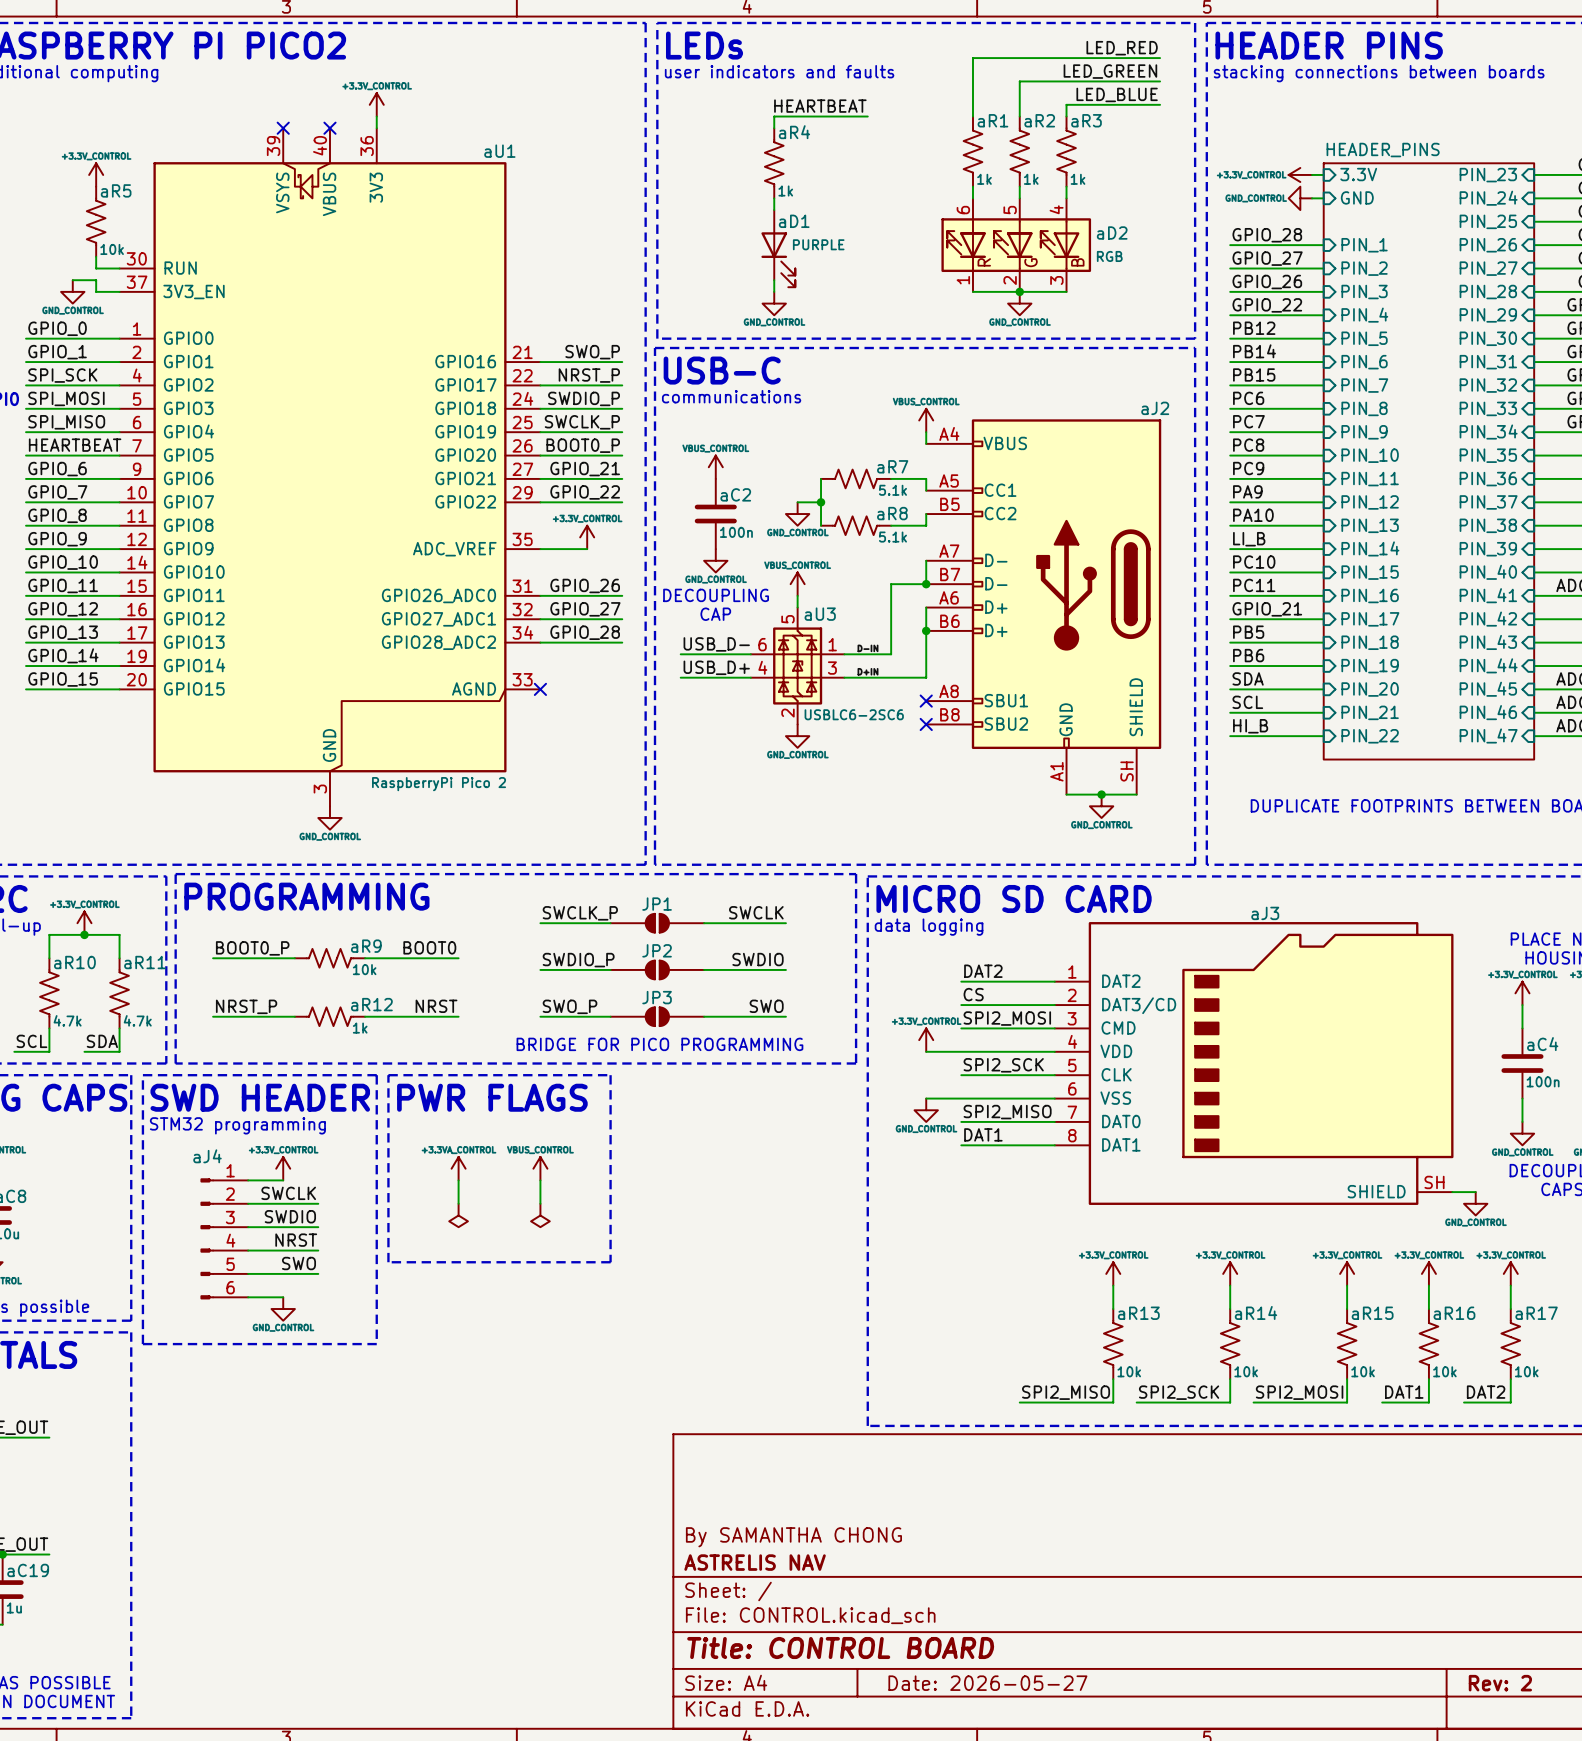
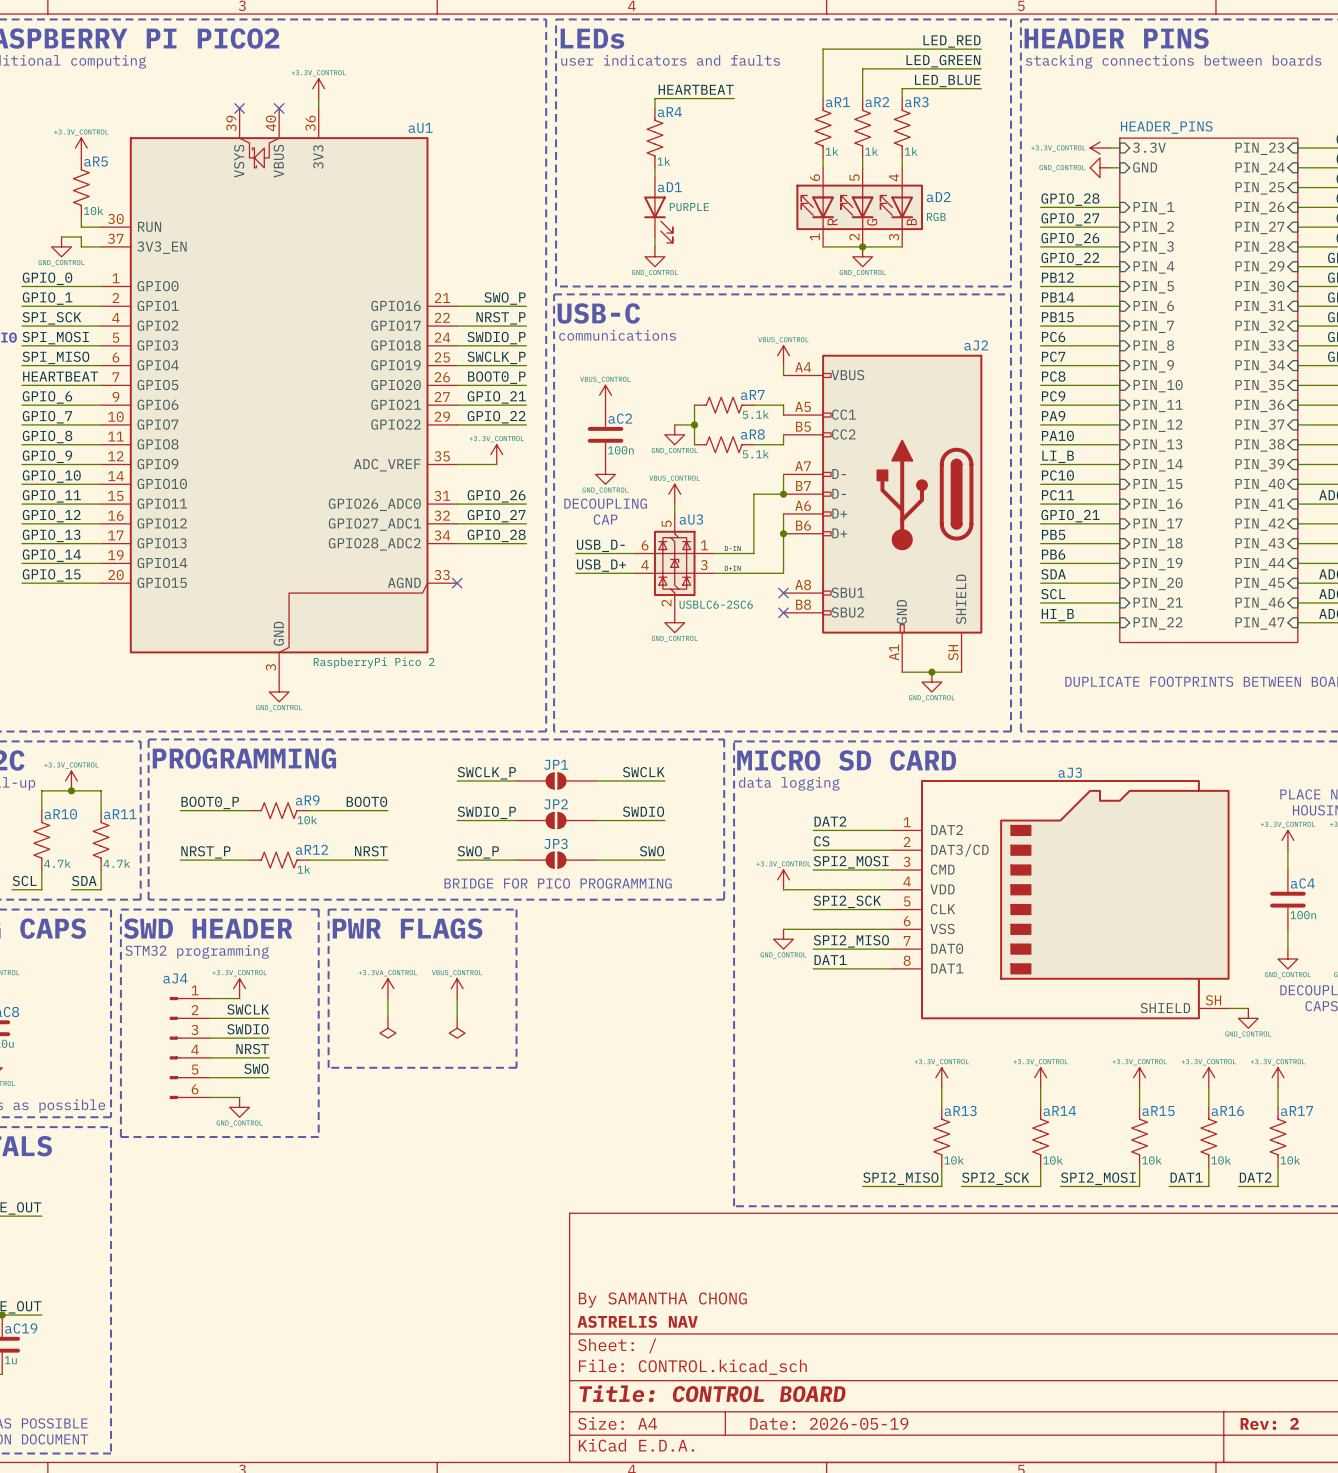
title block: Date: 2026-05-27 (987, 1683) -> Date: 2026-05-19 (829, 1423)

